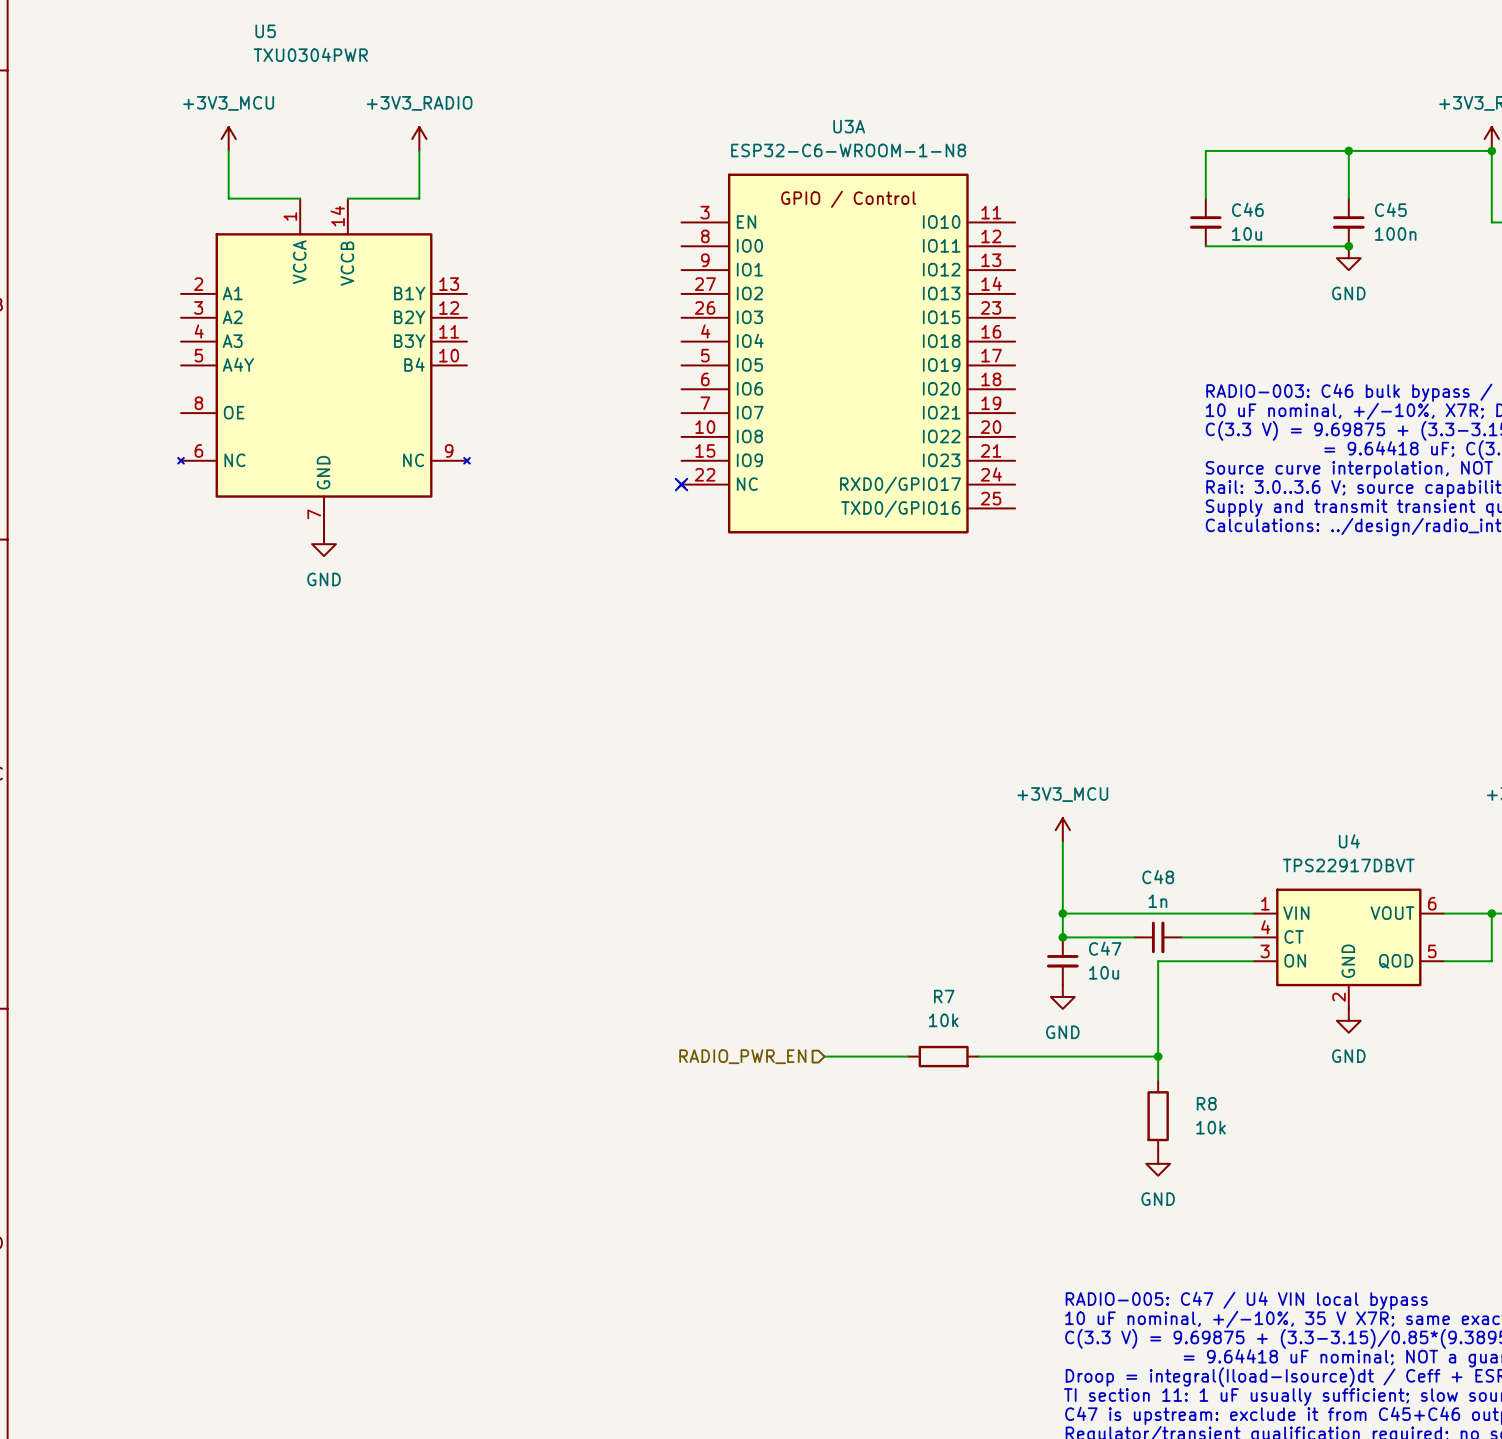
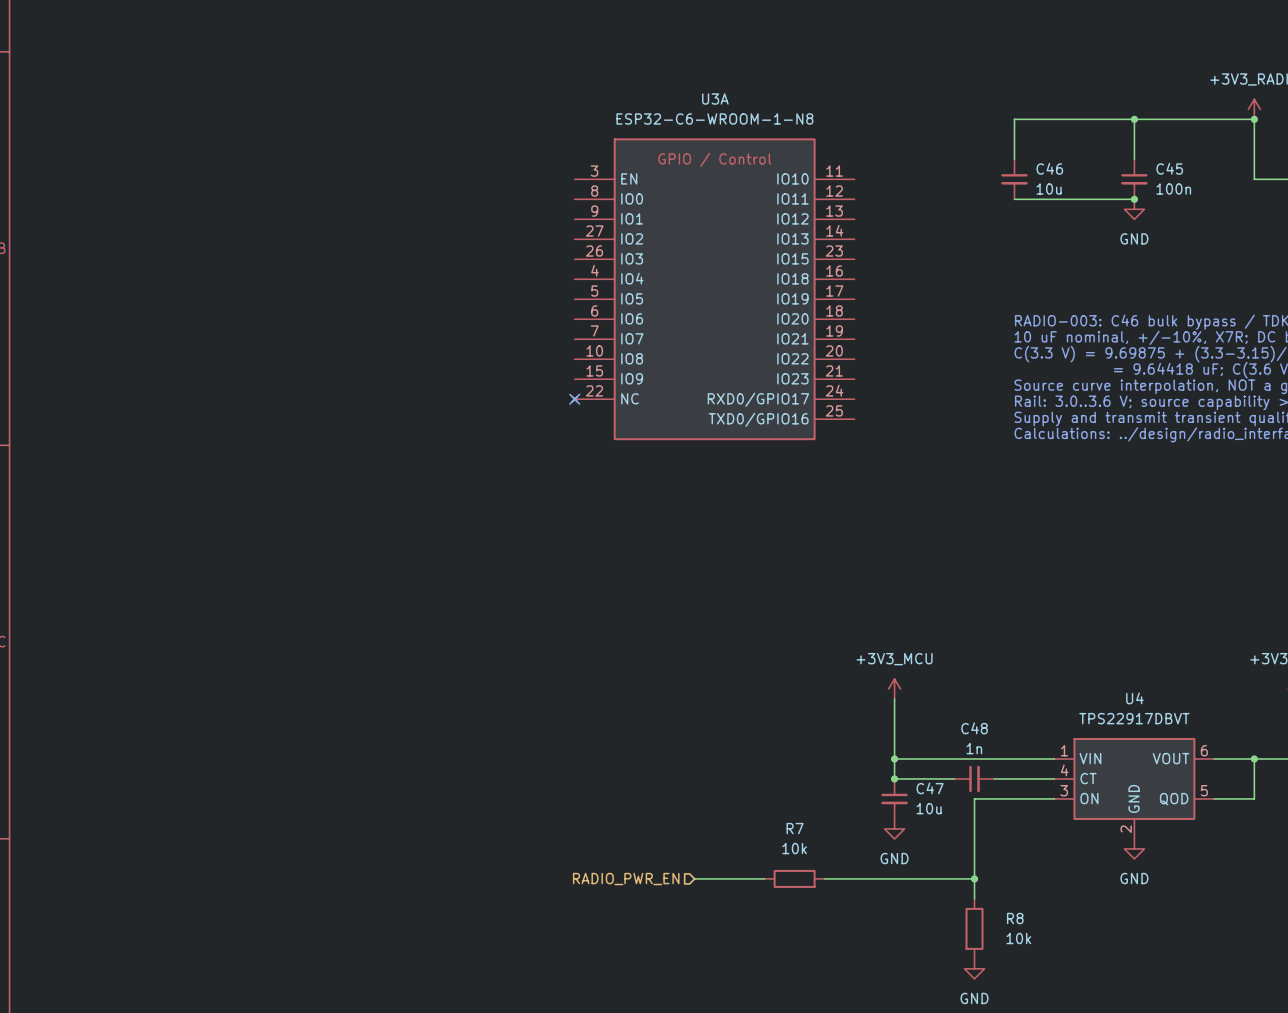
power symbol: +3V3_MCU (228, 139) -> none
power symbol: +3V3_RADIO (419, 139) -> none
wire: (228, 150) (228, 198) (300, 198) -> none
wire: (419, 150) (419, 198) (347, 198) -> none
U5: TXU0304PWR (324, 365) -> none
power symbol: GND (324, 544) -> none

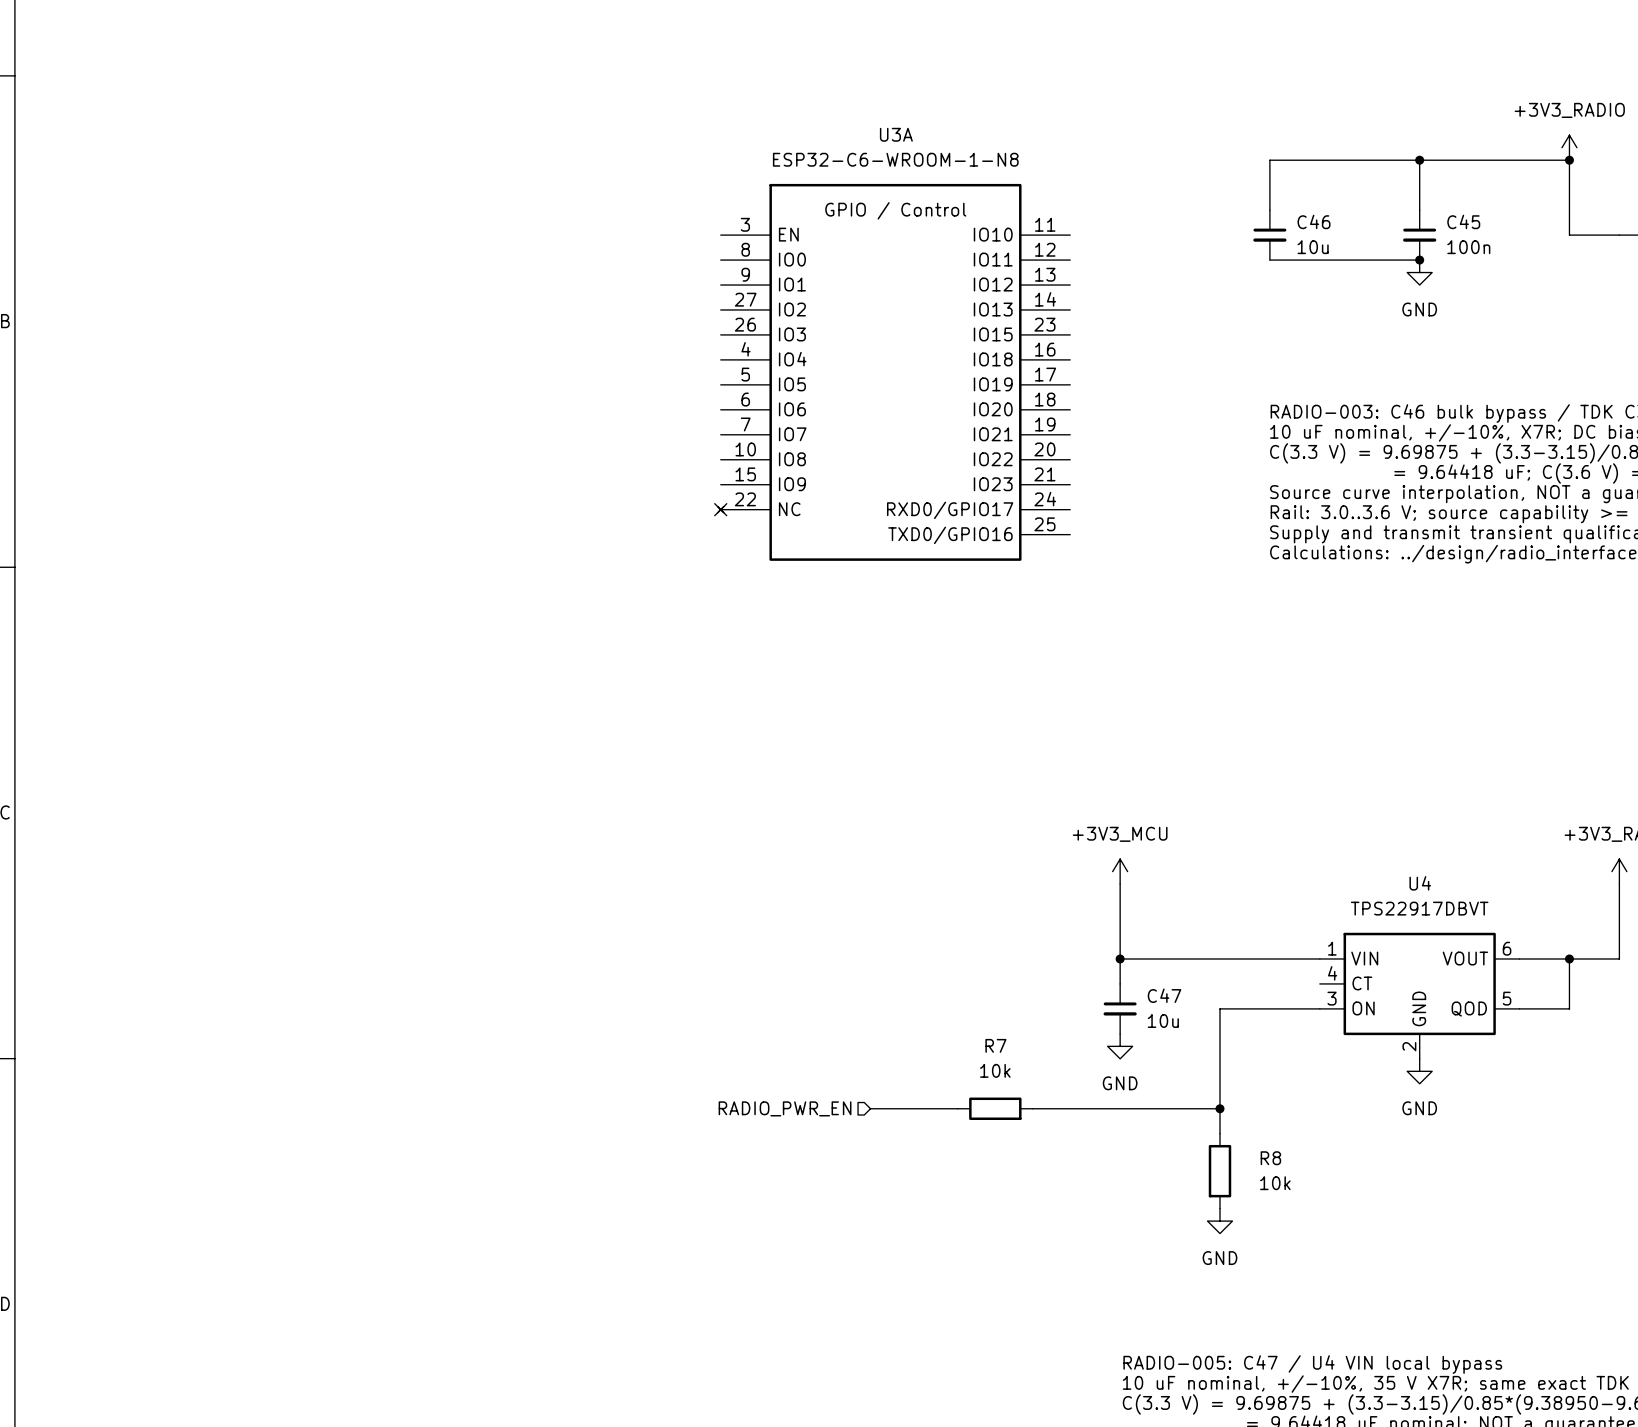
wire: (894, 778) (954, 778) -> none
junction: (894, 778) -> none
C48: 1n (974, 778) -> none
wire: (994, 778) (1054, 778) -> none

